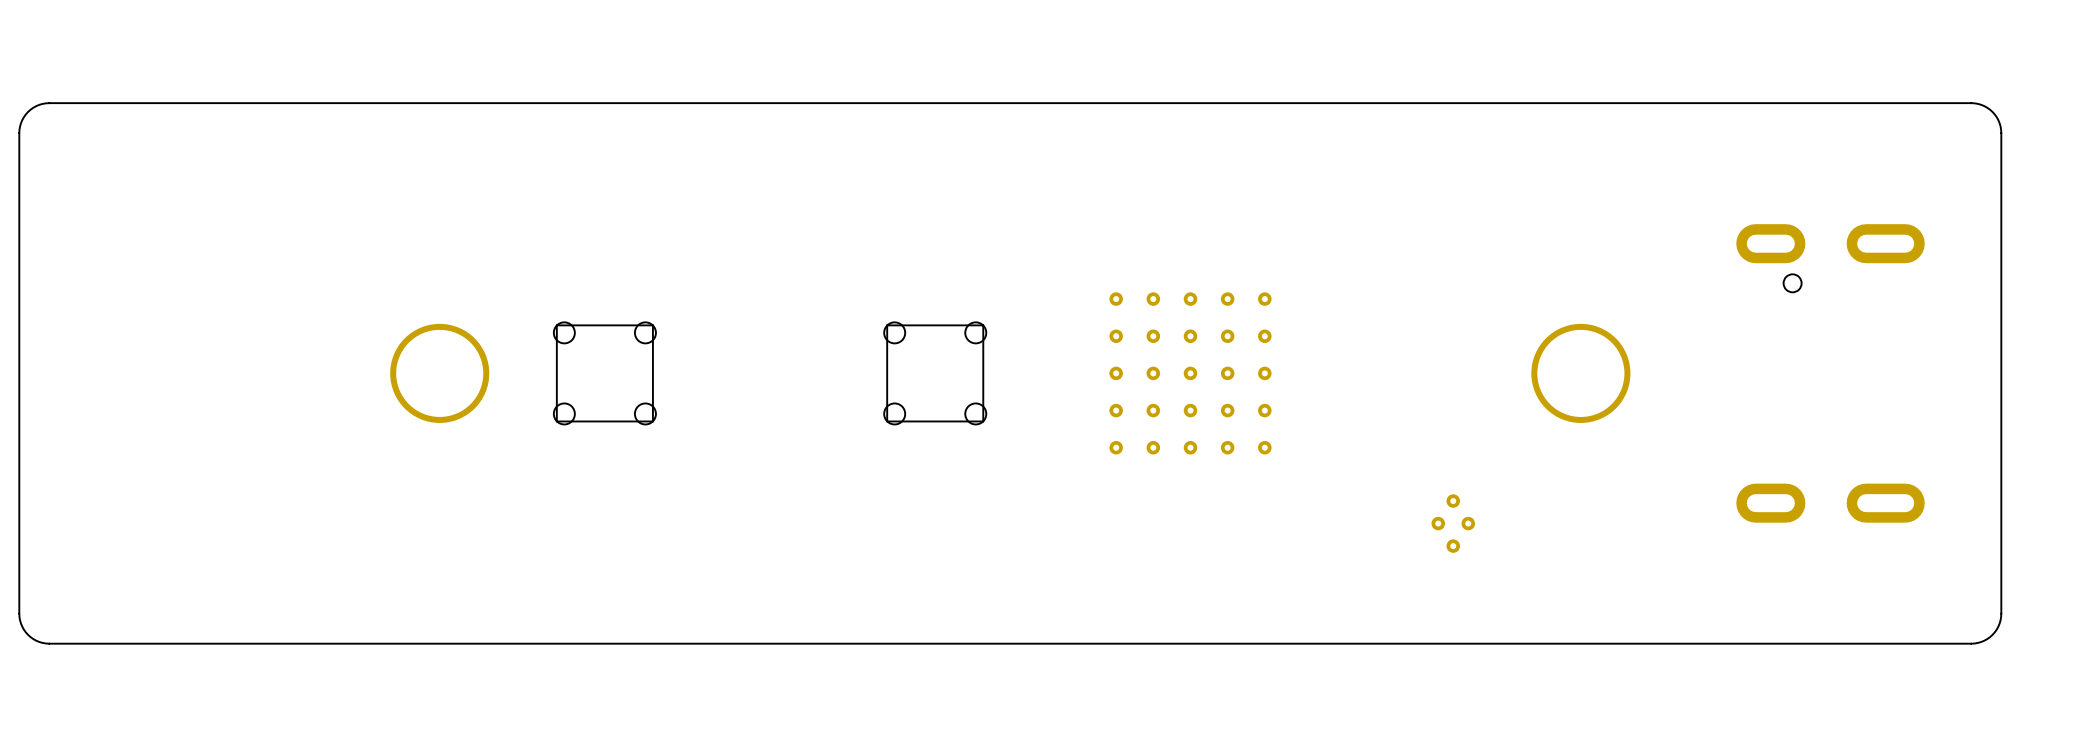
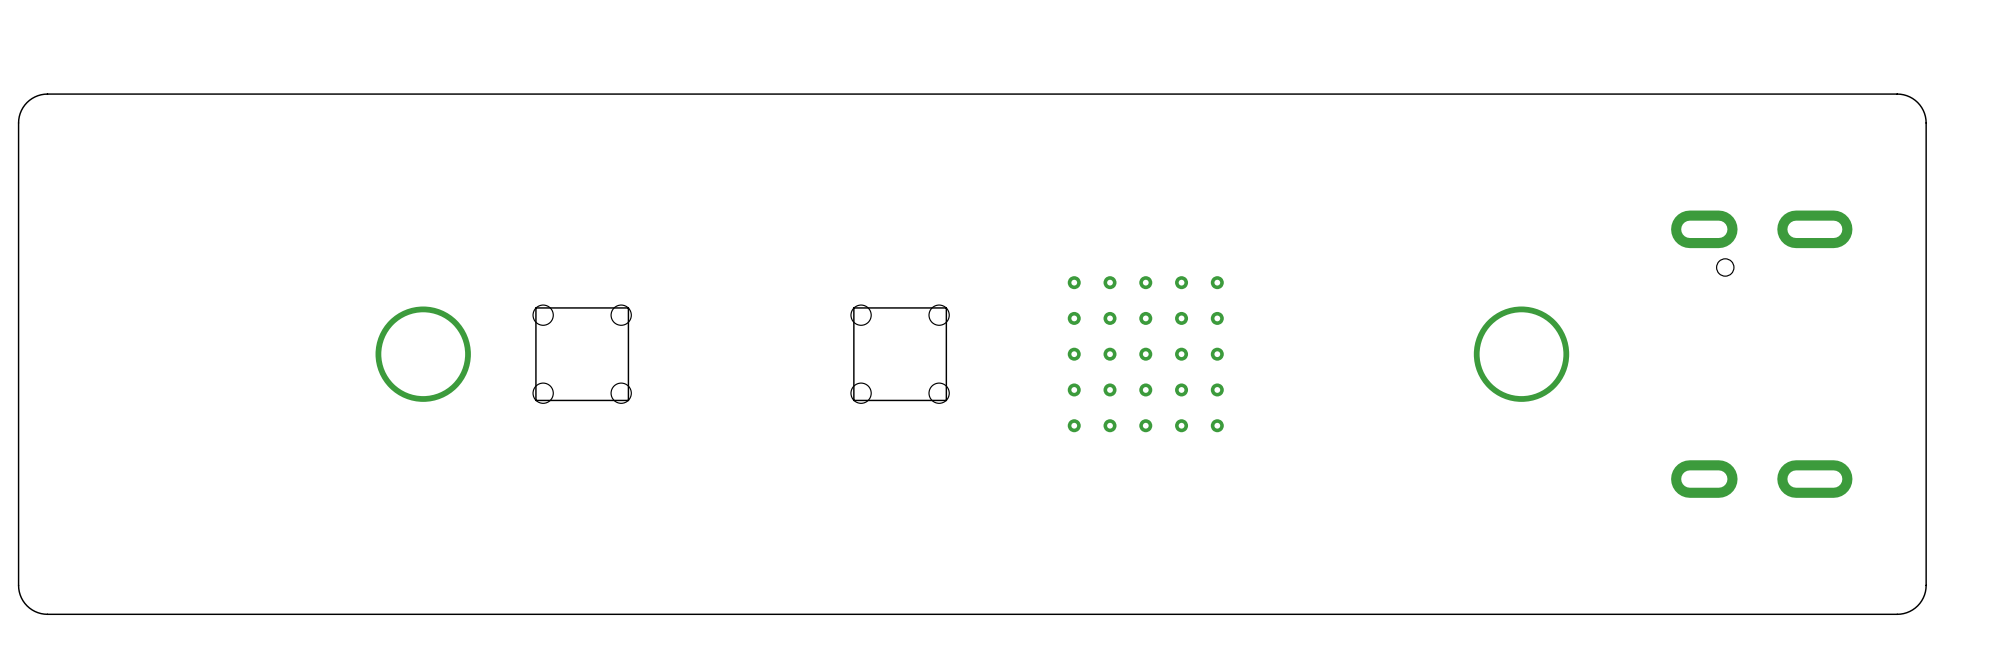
part: (1453, 523) -> none

